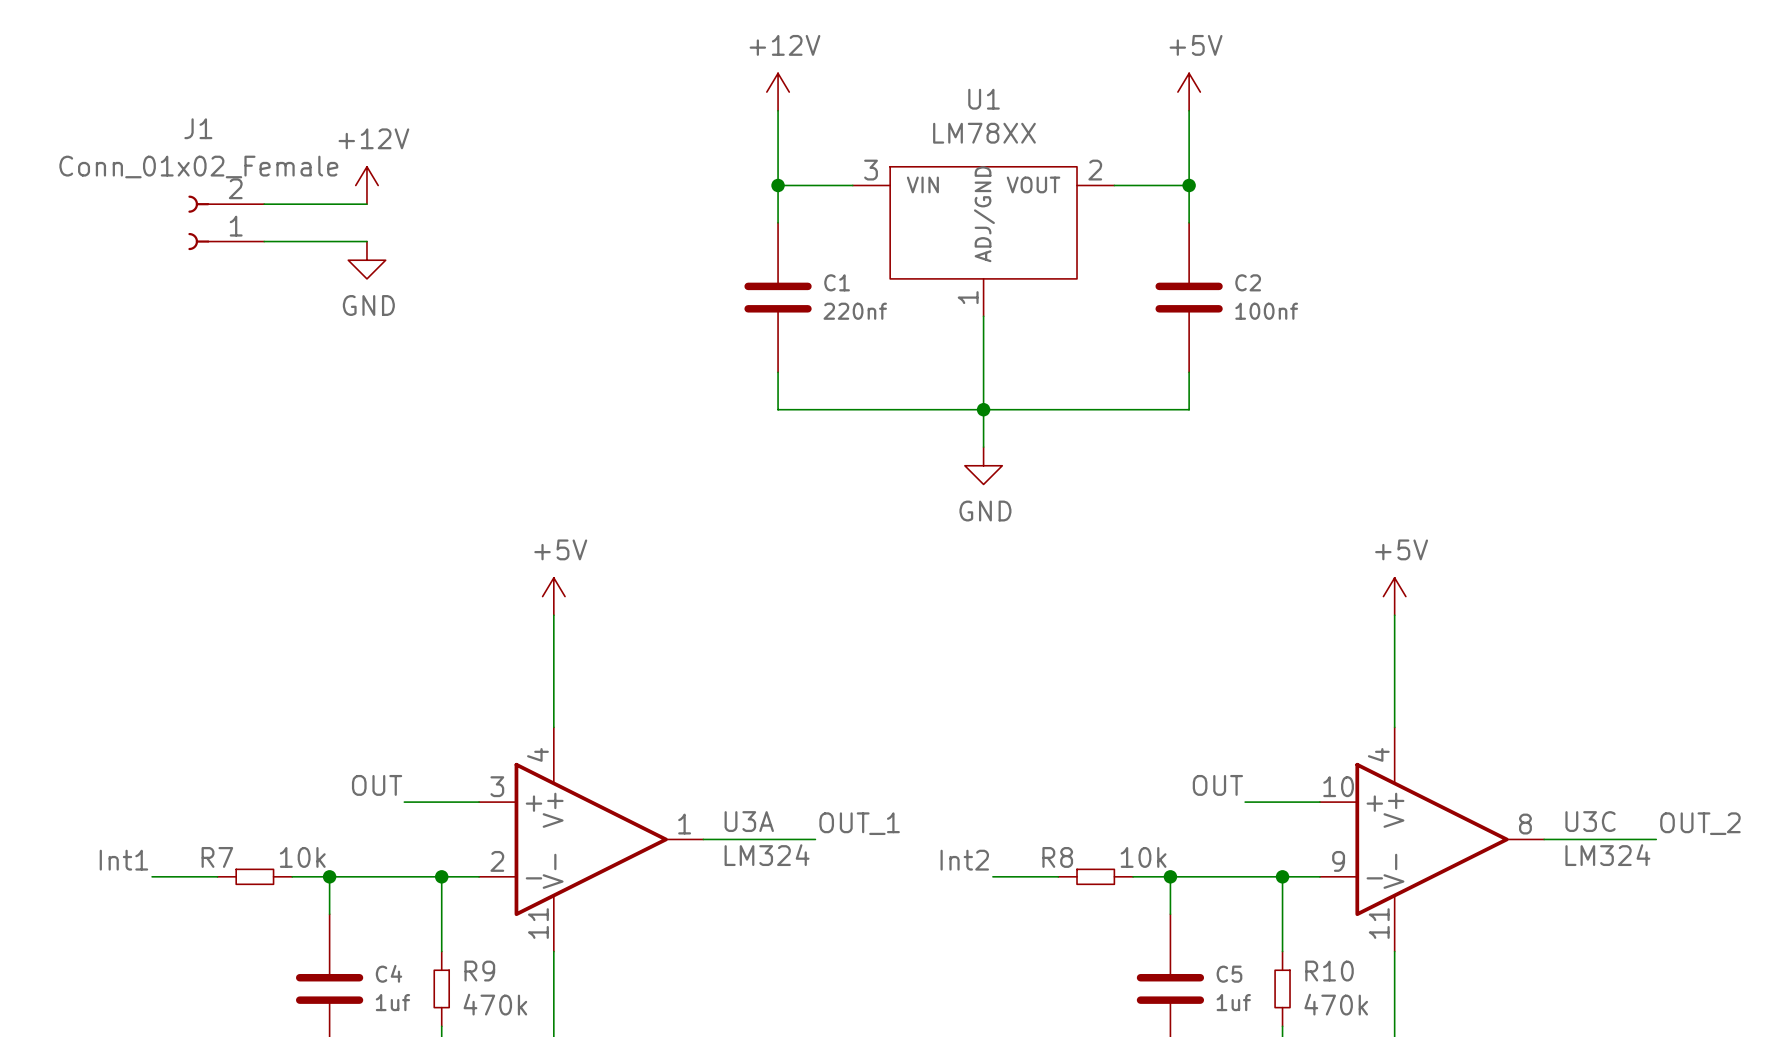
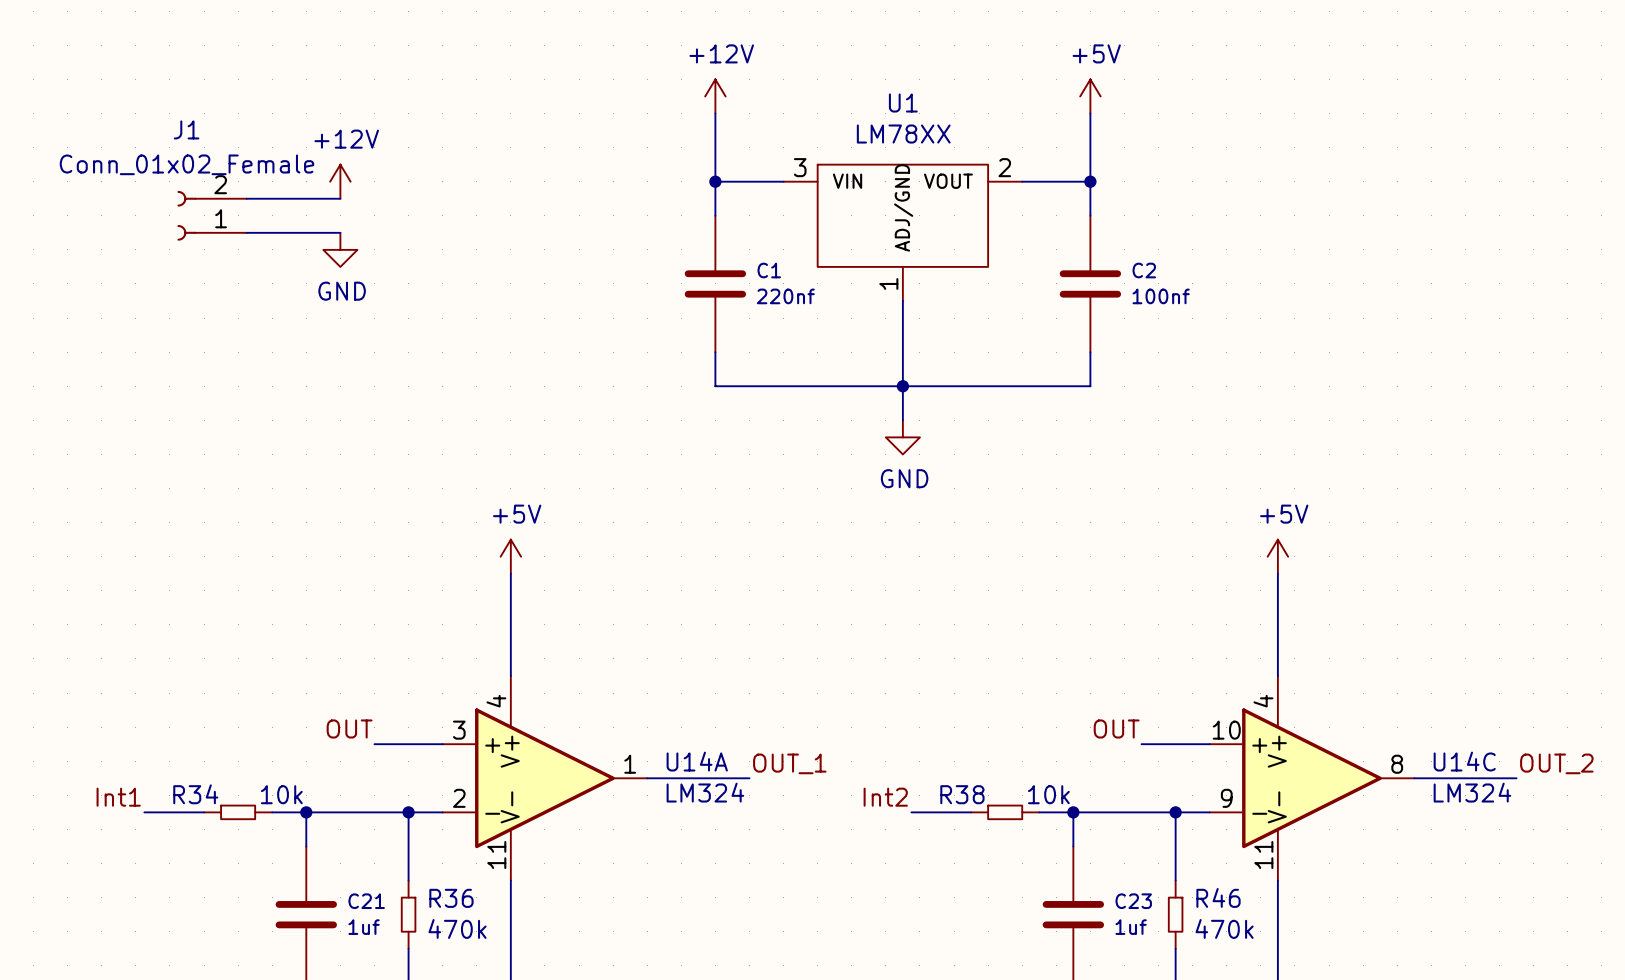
U3A name: U3A (749, 821) -> U14A (697, 761)
U3C name: U3C (1590, 821) -> U14C (1464, 761)
R7 name: R7 (217, 857) -> R34 (195, 794)
R8 name: R8 (1057, 857) -> R38 (962, 794)
R9 name: R9 (479, 971) -> R36 (451, 898)
R10 name: R10 (1329, 971) -> R46 (1218, 897)
C4 name: C4 (389, 973) -> C21 (366, 901)
C5 name: C5 (1229, 974) -> C23 (1133, 901)

